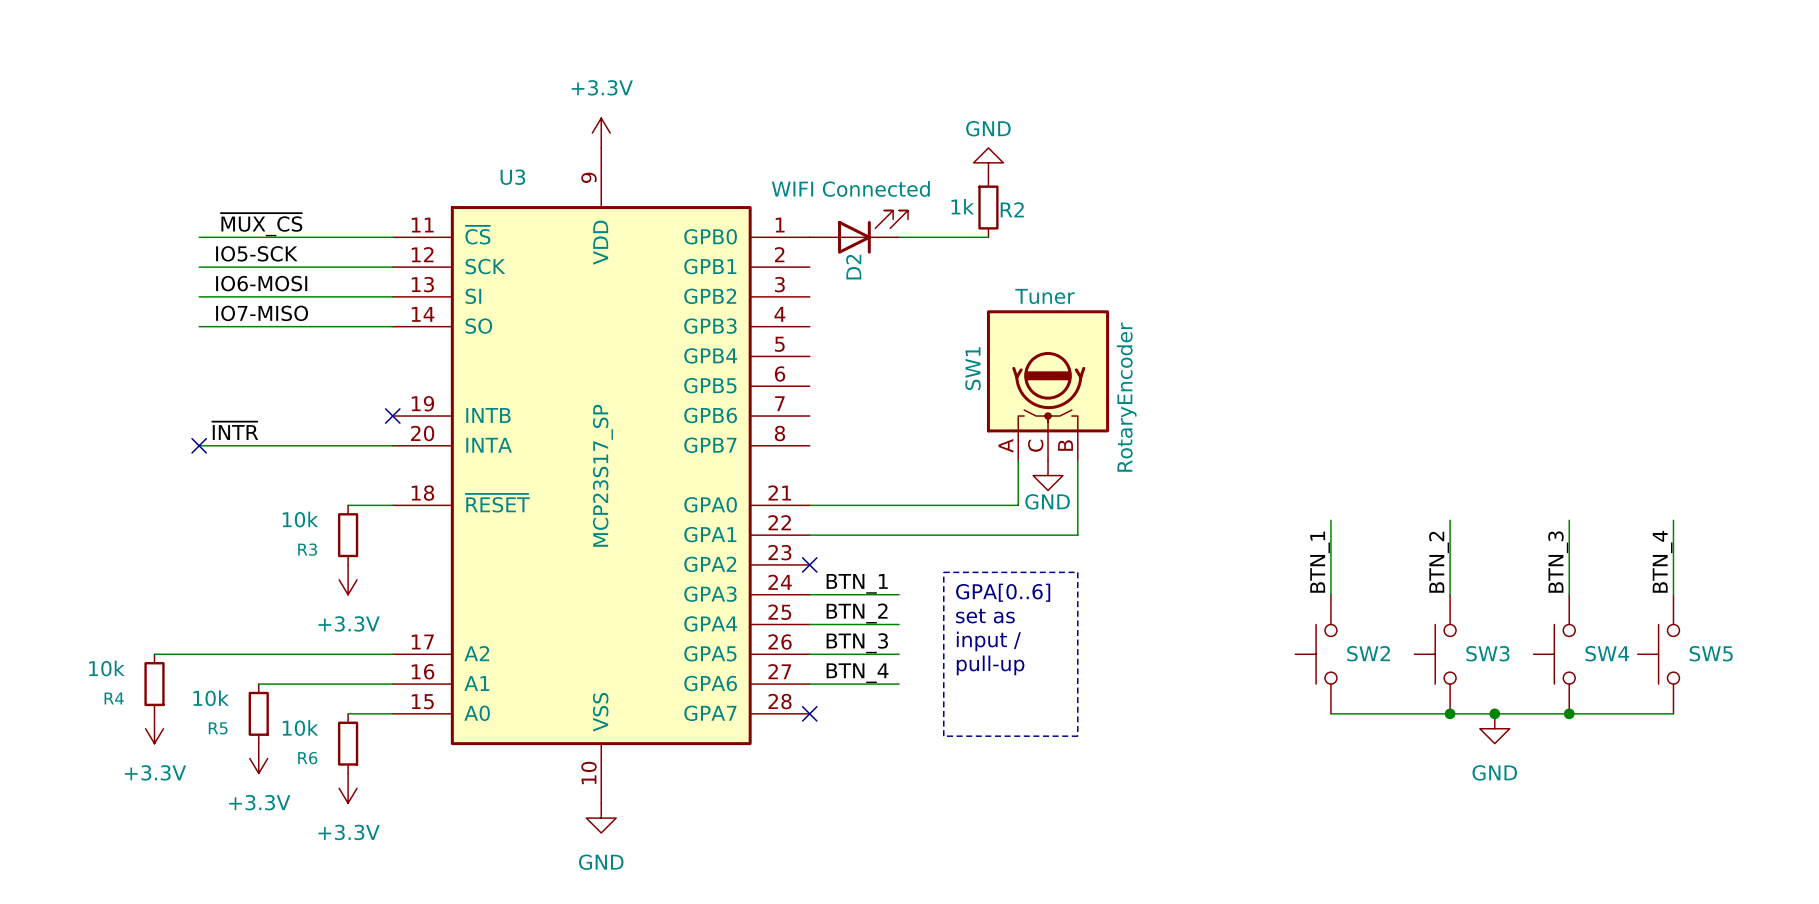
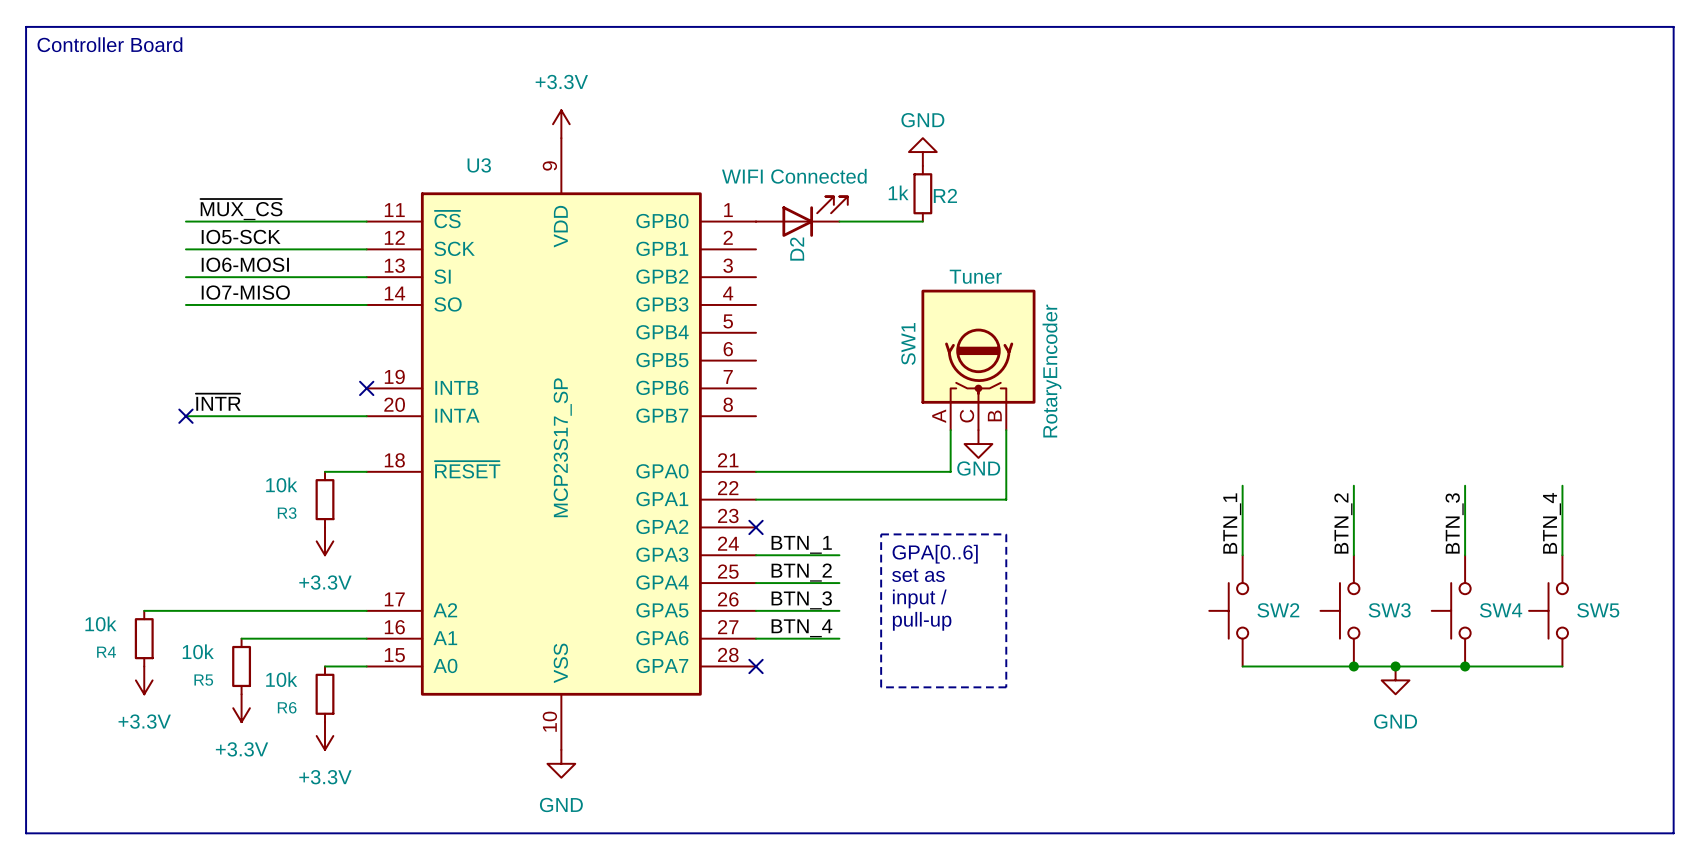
line: none -> (26, 26) (1673, 26) (1673, 833) (26, 833) (26, 26)
text: none -> Controller Board (109, 44)

